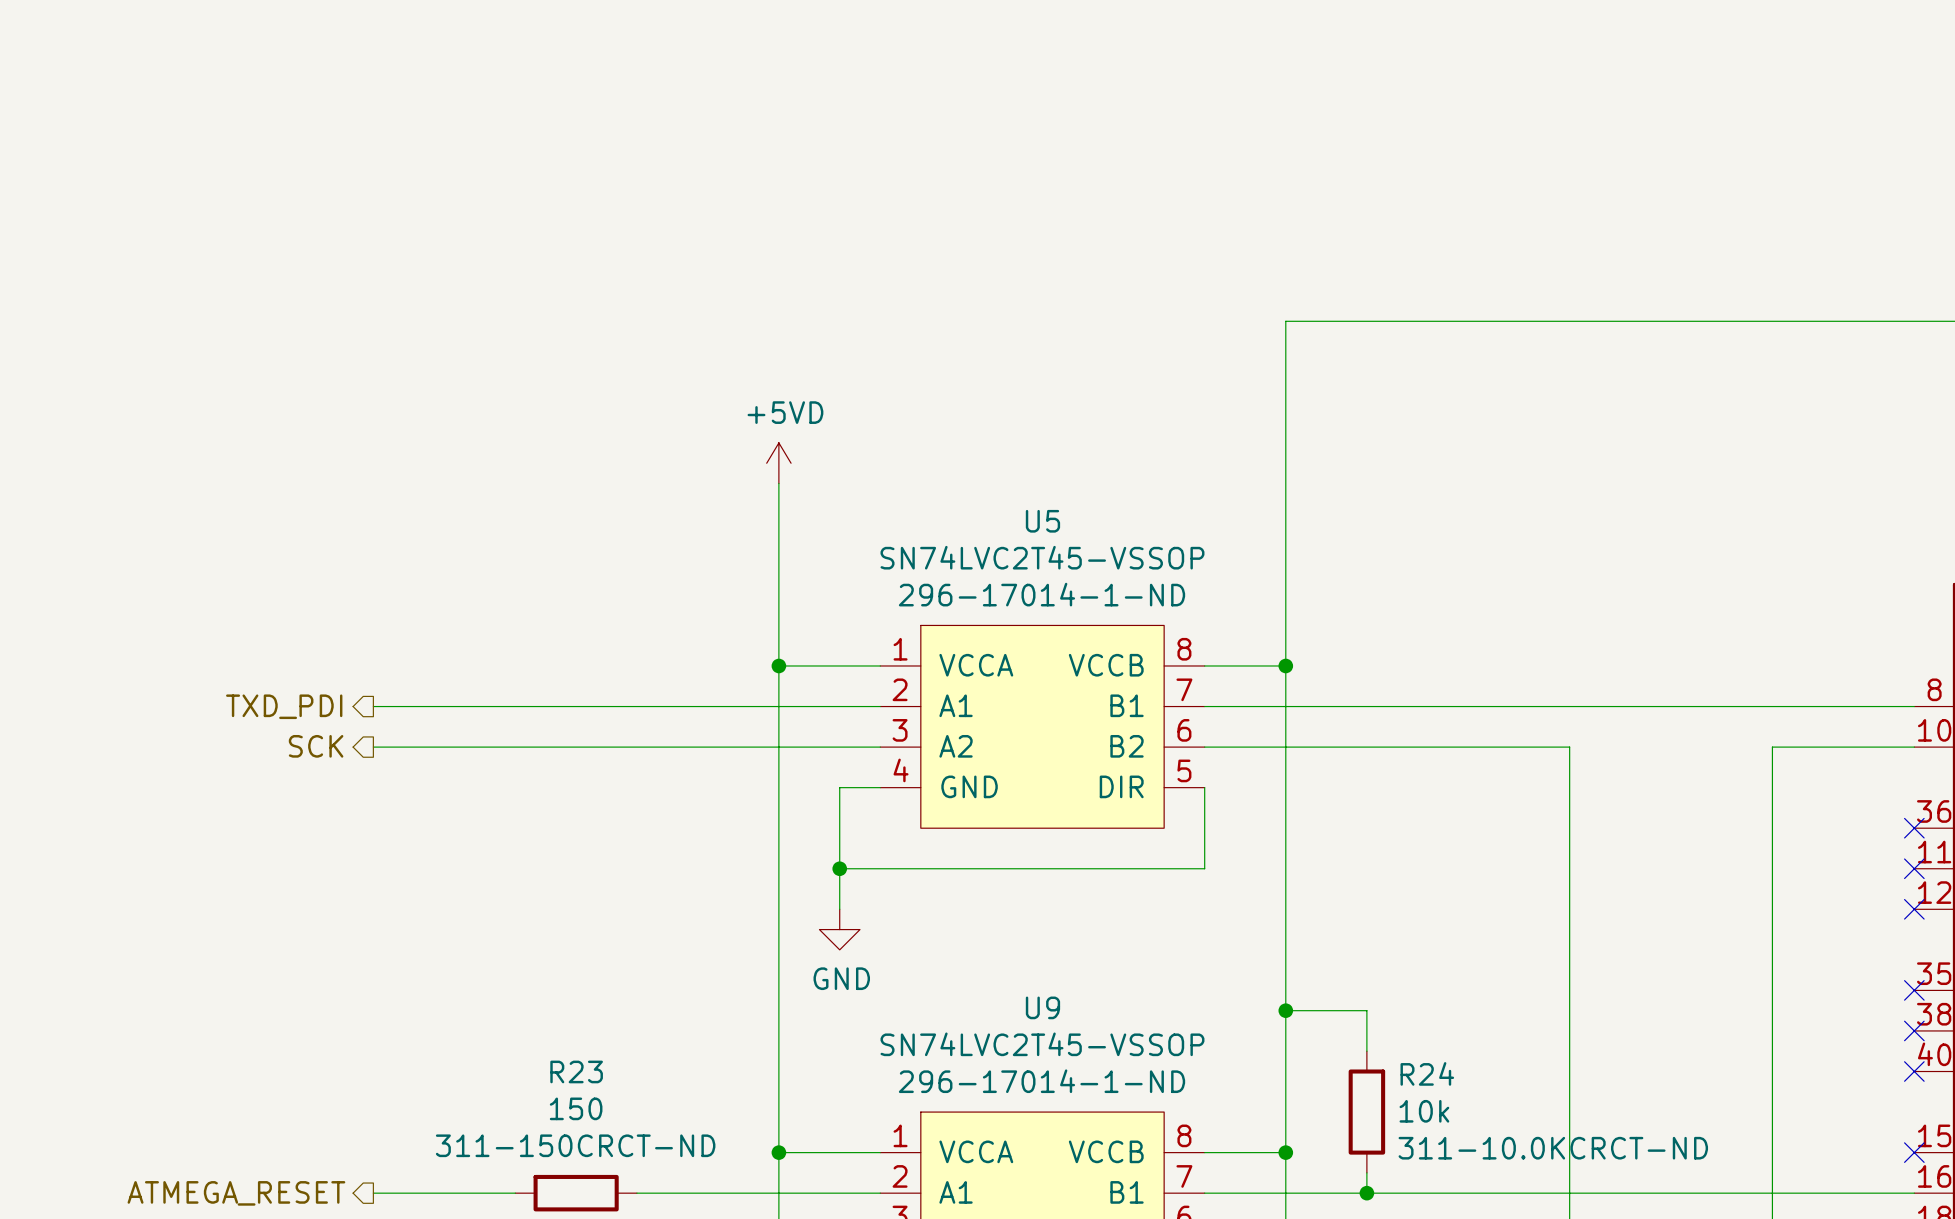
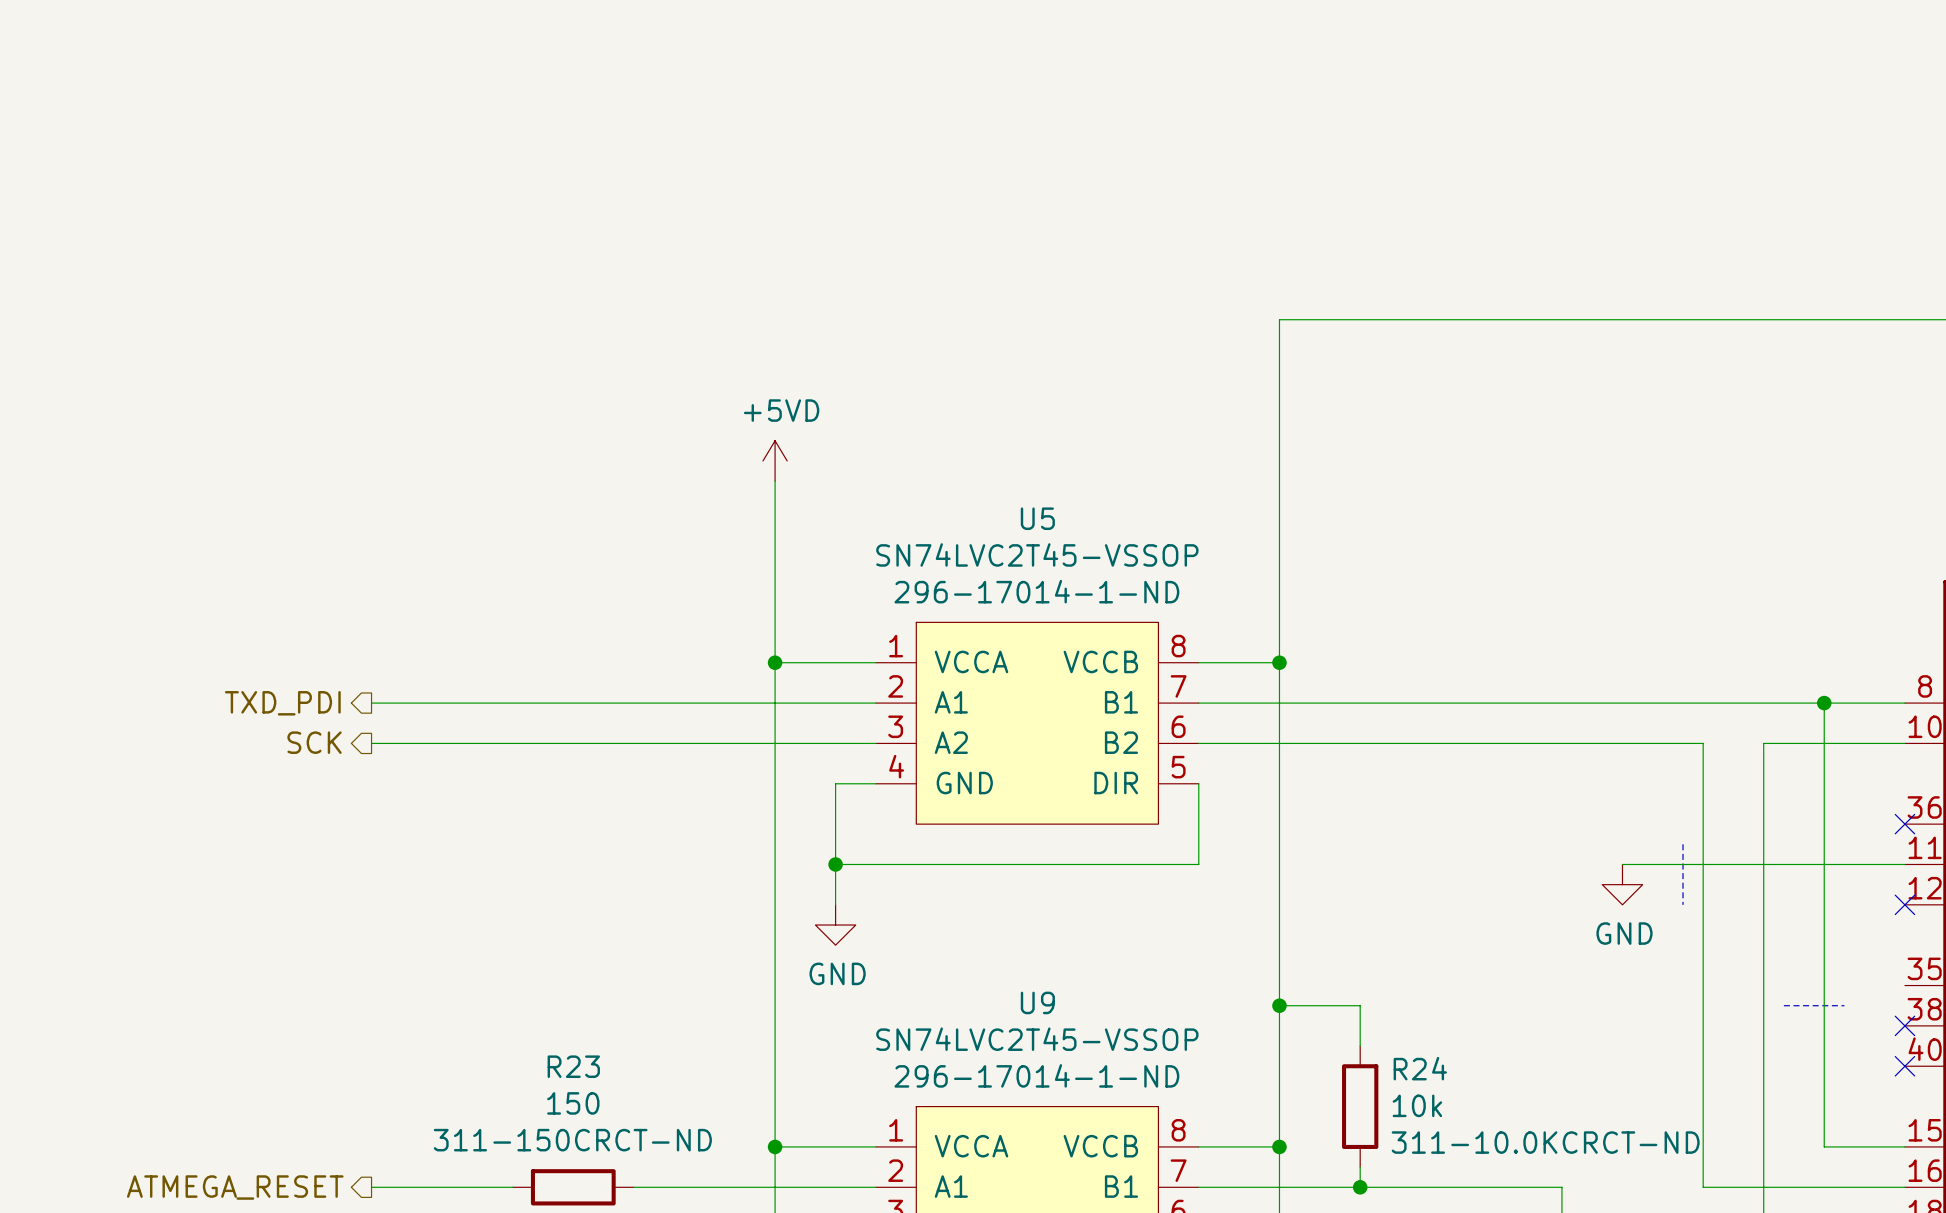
wire: none -> (1824, 703) (1824, 1146) (1904, 1146)
junction: none -> (1824, 703)
wire: (1569, 747) (1569, 1193) (1711, 1193) -> (1561, 743) (1703, 743) (1703, 1187)
line: none -> (1683, 844) (1683, 904)
wire: none -> (1622, 864) (1904, 864)
no-connect mark: (1914, 868) -> none
power symbol: none -> GND (1622, 884)
no-connect mark: (1914, 990) -> none
line: none -> (1783, 1005) (1844, 1005)
no-connect mark: (1914, 1152) -> none

